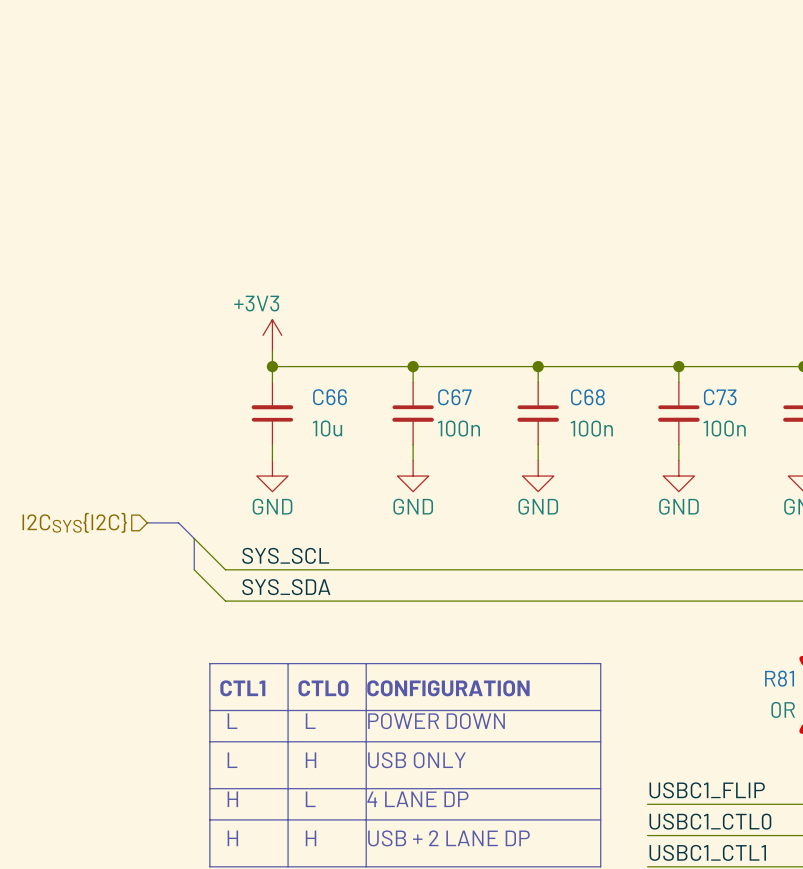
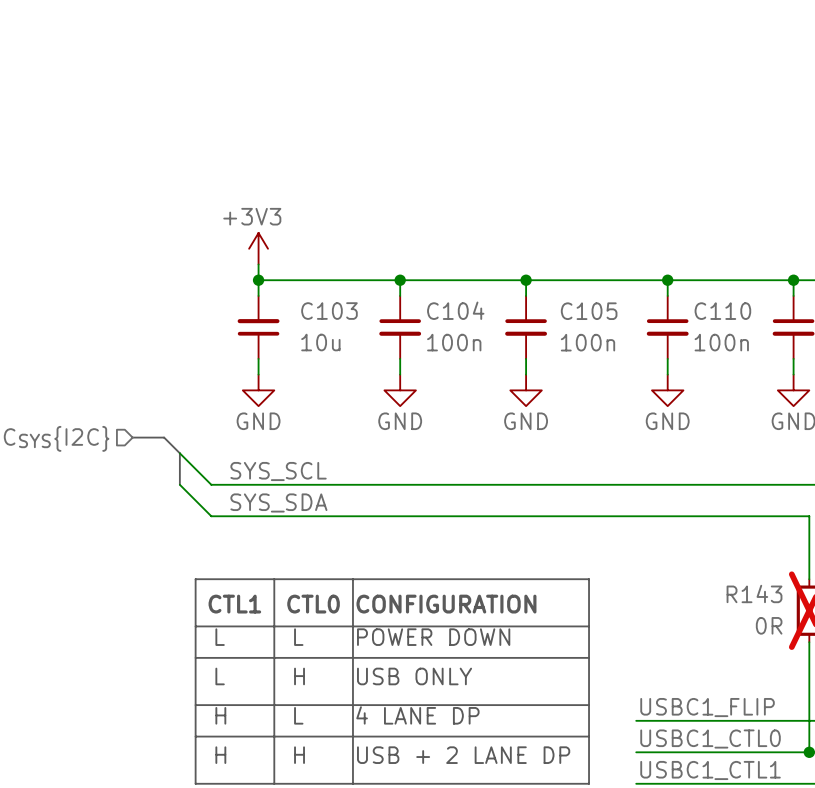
C66 name: C66 (330, 397) -> C103 (329, 311)
C67 name: C67 (454, 397) -> C104 (455, 310)
C68 name: C68 (587, 397) -> C105 (589, 311)
C73 name: C73 (720, 397) -> C110 (722, 311)
R81 name: R81 (779, 678) -> R143 (754, 593)

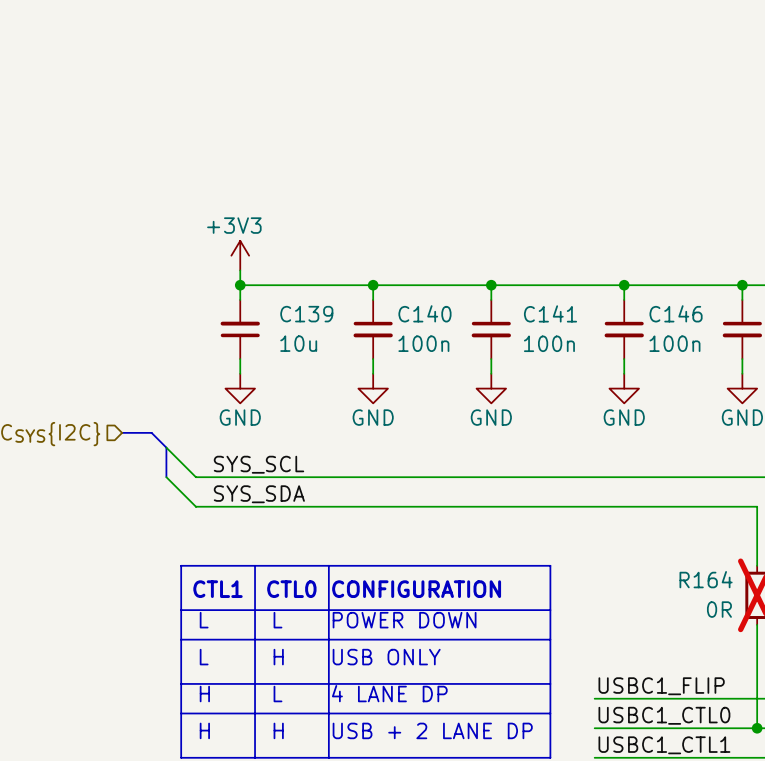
C104 name: C104 (455, 310) -> C140 (424, 313)
C103 name: C103 (329, 311) -> C139 (306, 314)
C105 name: C105 (589, 311) -> C141 (550, 313)
C110 name: C110 (722, 311) -> C146 (676, 313)
R143 name: R143 (754, 593) -> R164 (706, 579)

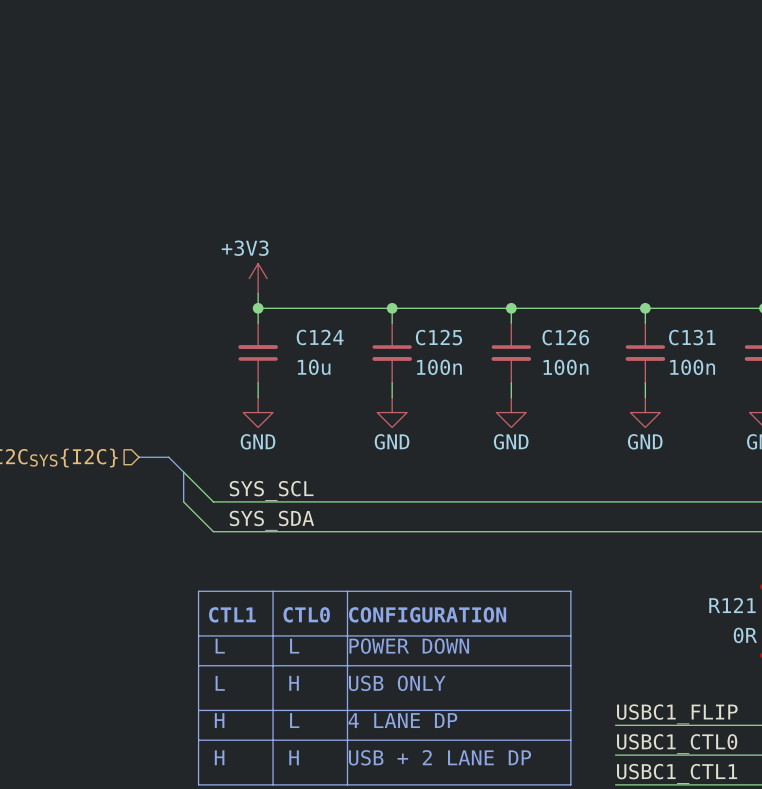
C140 name: C140 (424, 313) -> C125 (438, 337)
C141 name: C141 (550, 313) -> C126 (565, 337)
C146 name: C146 (676, 313) -> C131 (692, 337)
C139 name: C139 (306, 314) -> C124 (320, 337)
R164 name: R164 (706, 579) -> R121 (732, 605)

